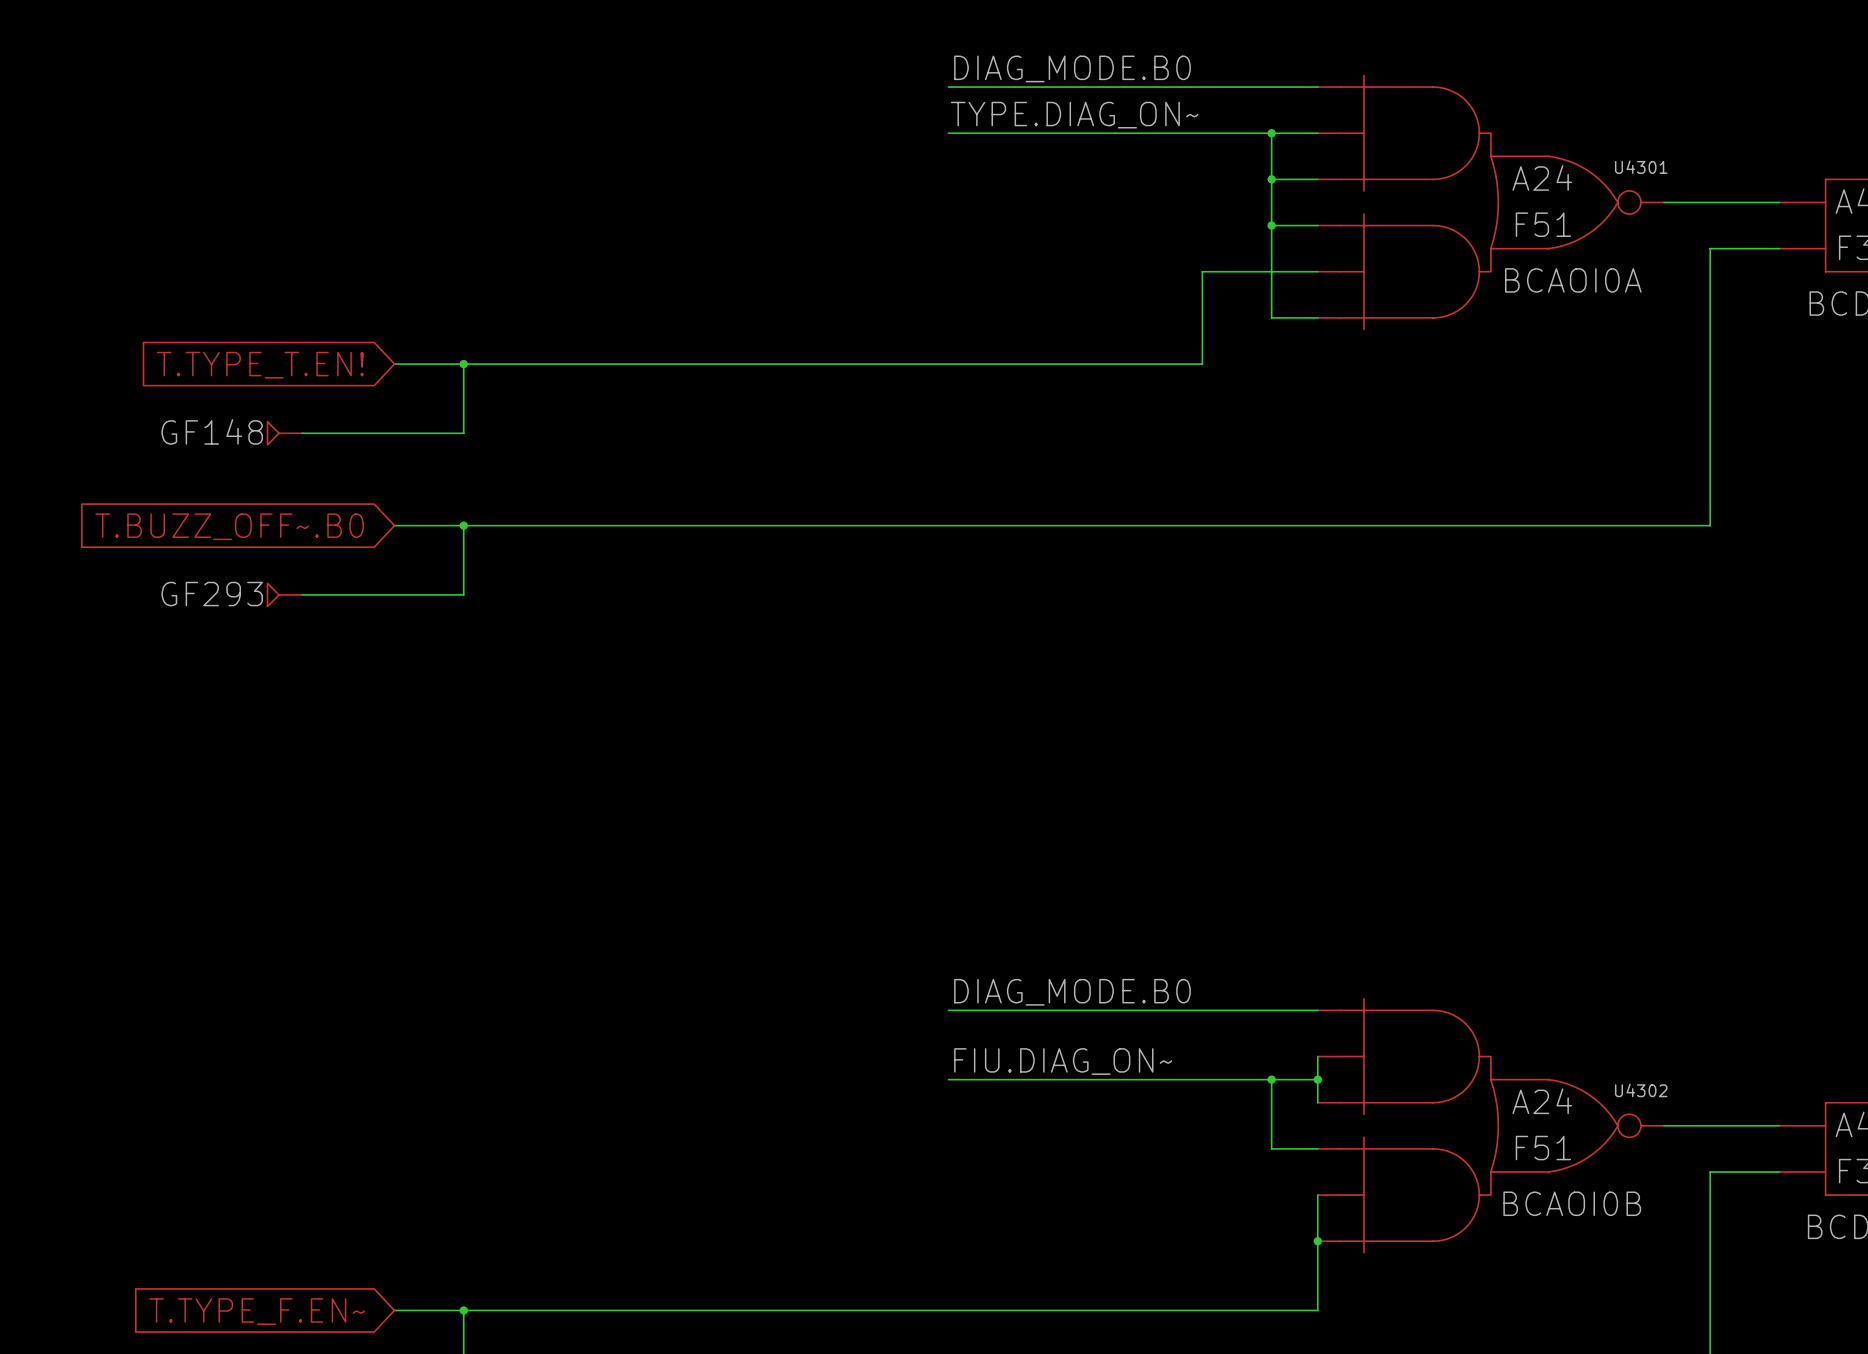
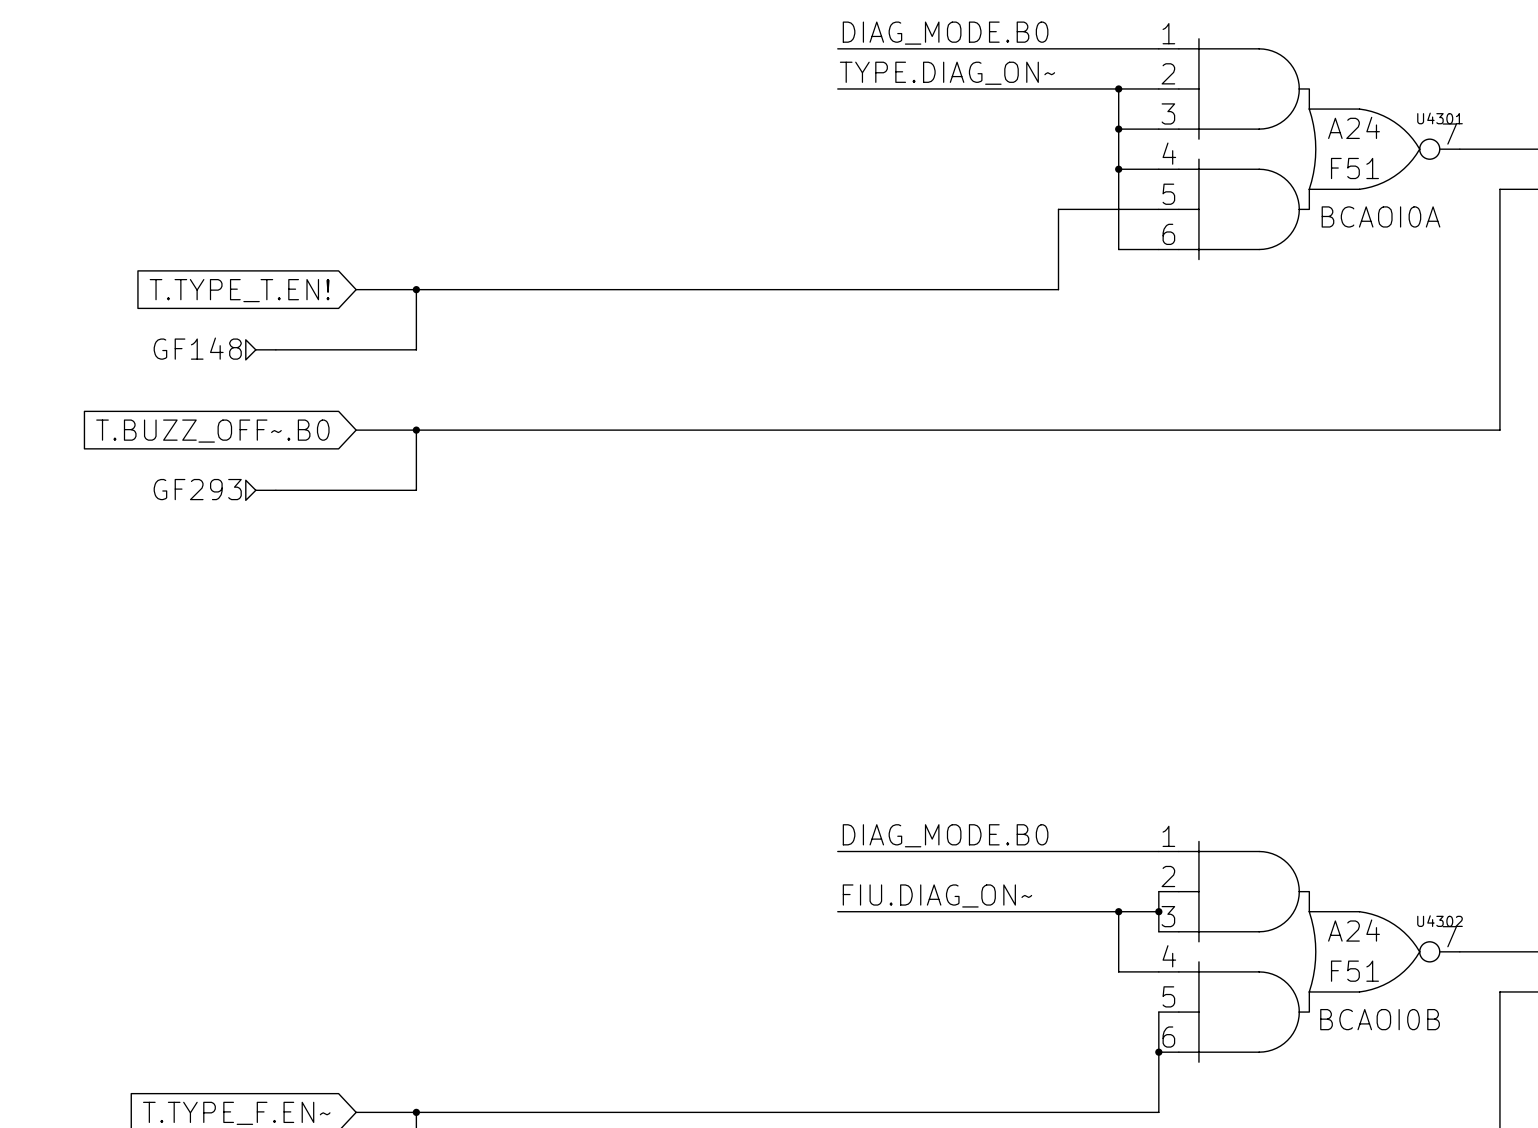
U4301 pin number: none -> 1 (1168, 33)
U4301 pin number: none -> 2 (1168, 73)
U4301 pin number: none -> 3 (1168, 113)
U4301 pin number: none -> 7 (1449, 134)
U4301 pin number: none -> 4 (1169, 153)
U4301 pin number: none -> 5 (1168, 194)
U4301 pin number: none -> 6 (1168, 234)
U4302 pin number: none -> 1 (1168, 836)
U4302 pin number: none -> 2 (1168, 876)
U4302 pin number: none -> 3 (1168, 916)
U4302 pin number: none -> 7 (1449, 936)
U4302 pin number: none -> 4 (1169, 956)
U4302 pin number: none -> 5 (1168, 996)
U4302 pin number: none -> 6 (1168, 1037)

